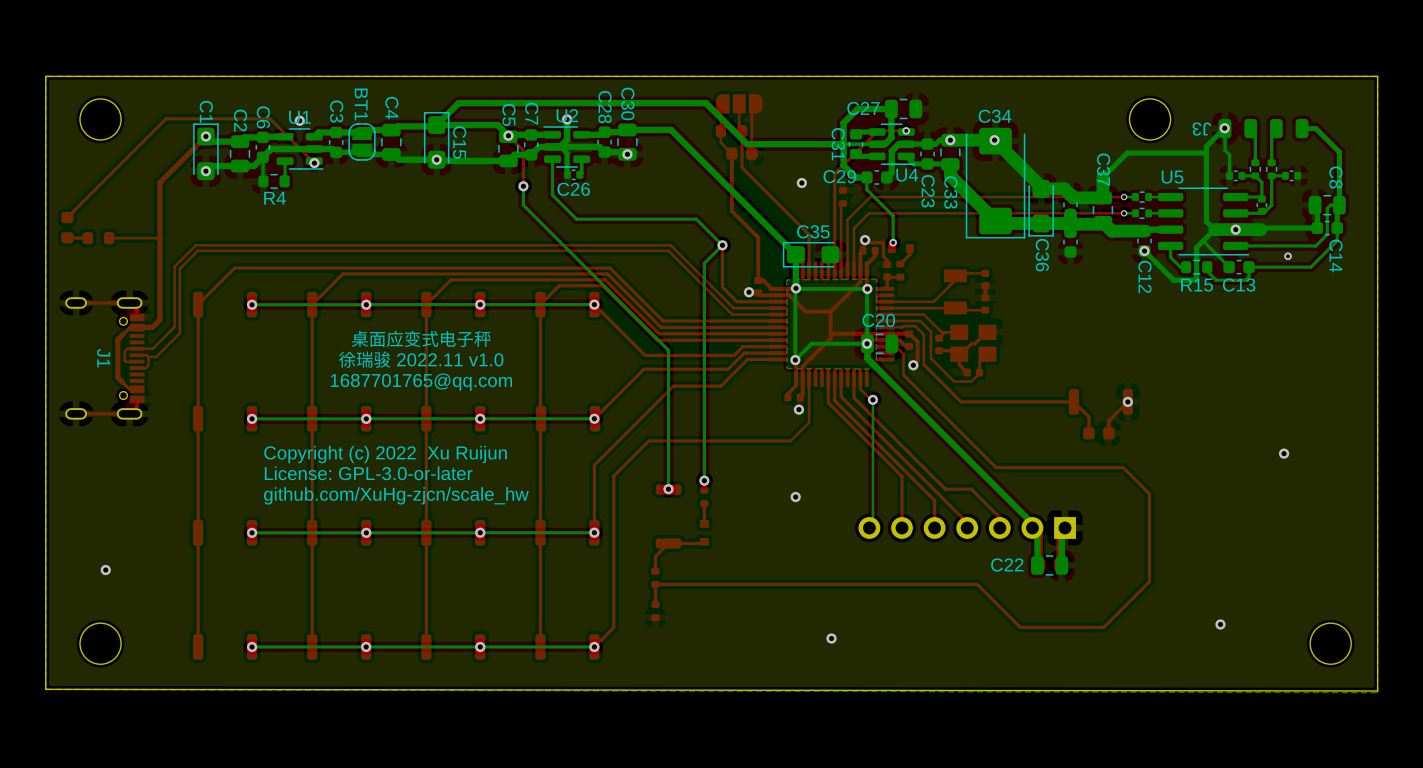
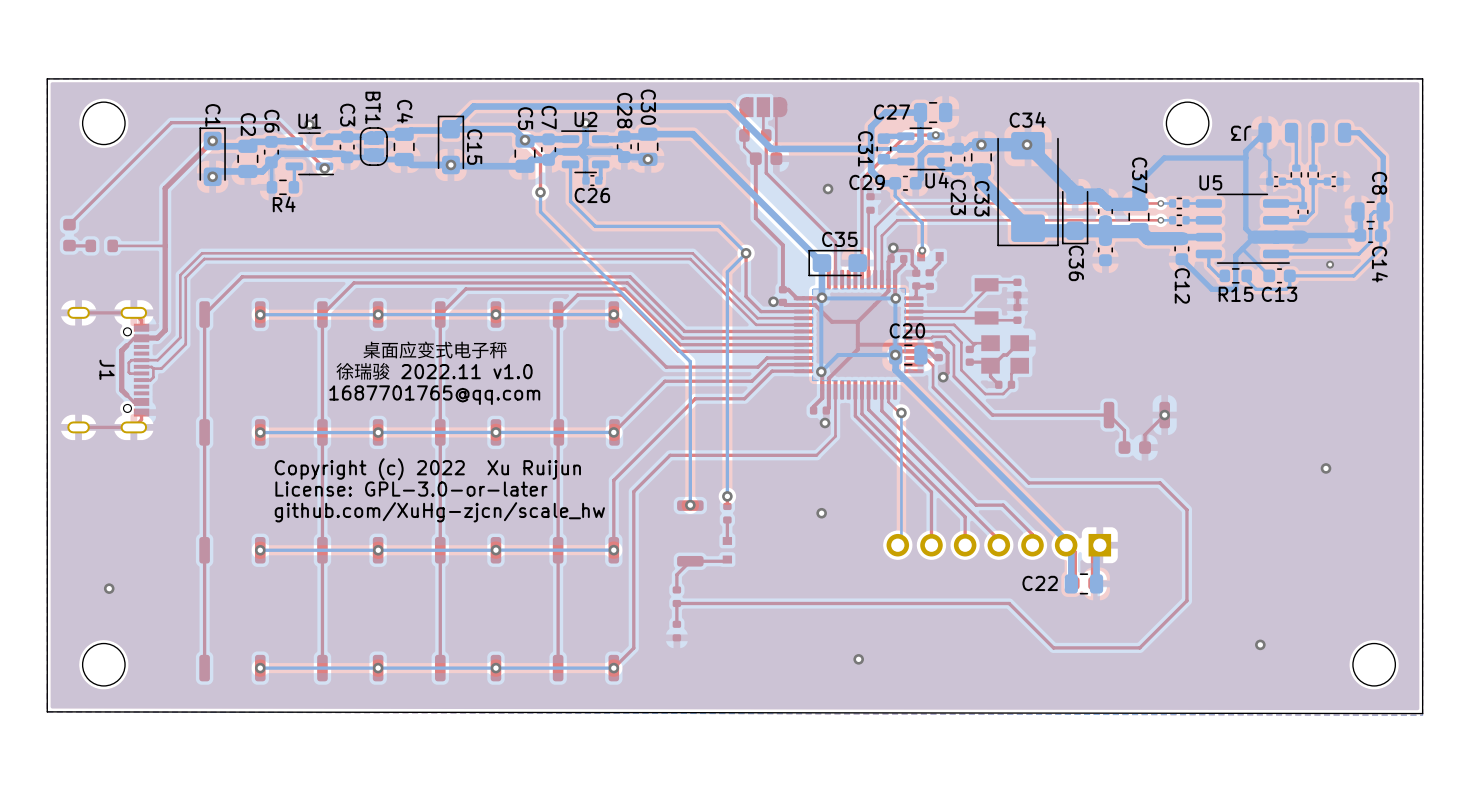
via: (1224, 128) -> none
via: (1235, 229) -> none
via: (1144, 251) -> none

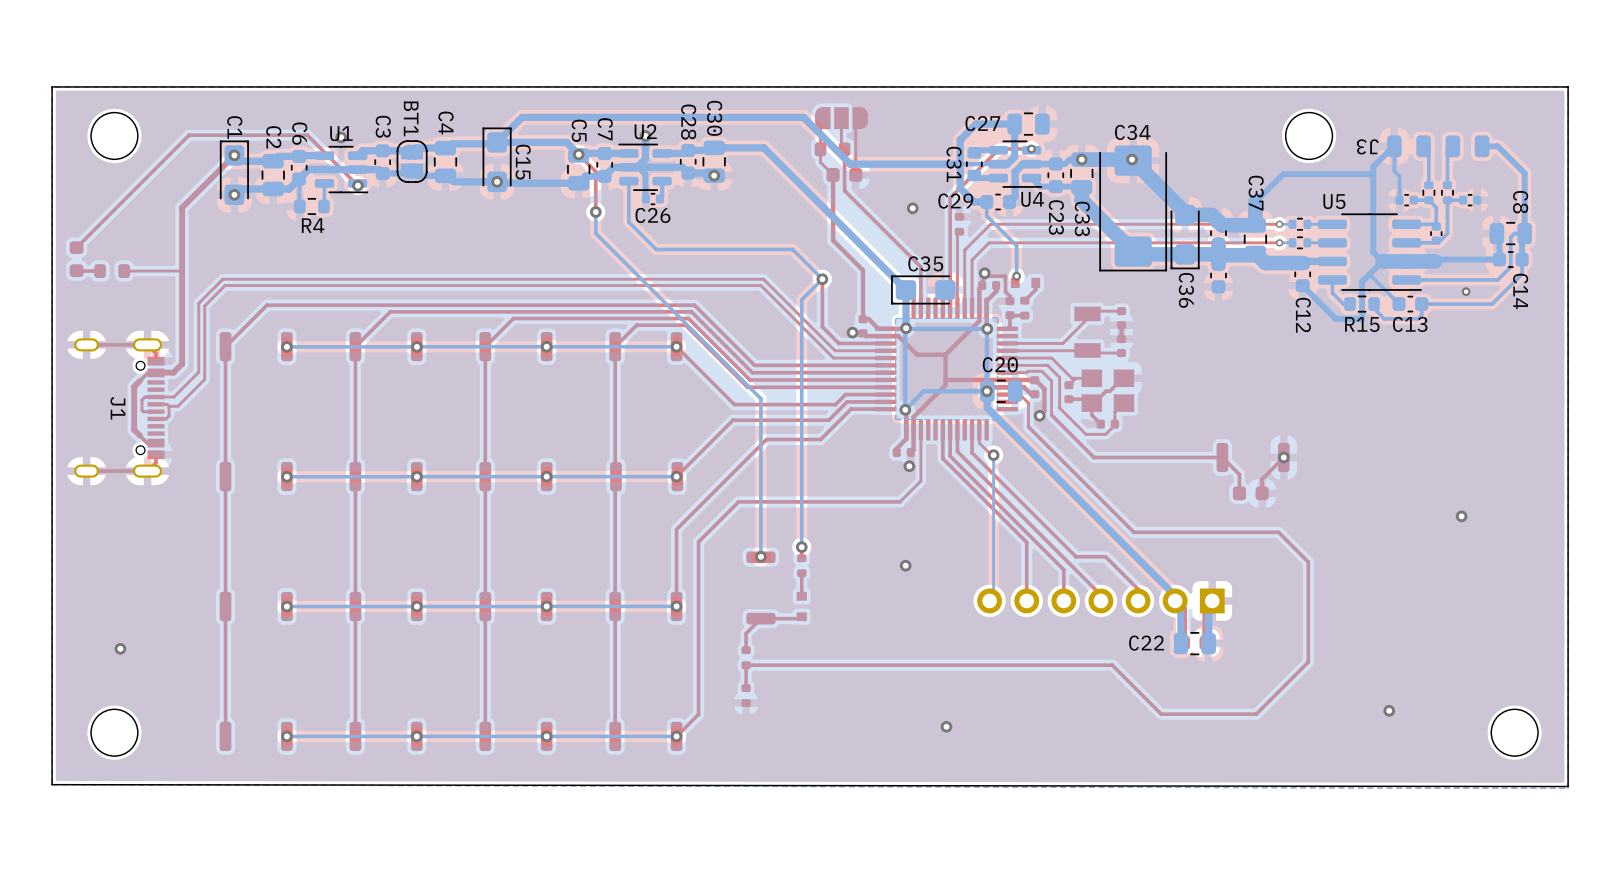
text: 桌面应变式电子秤 (435, 350) -> none
text: 徐瑞骏 2022.11 v1.0 (434, 371) -> none
text: 1687701765@qq.com (434, 395) -> none
text: Copyright (c) 2022 Xu Ruijun (427, 469) -> none
text: License: GPL-3.0-or-later (411, 489) -> none
text: github.com/XuHg-zjcn/scale_hw (439, 512) -> none

